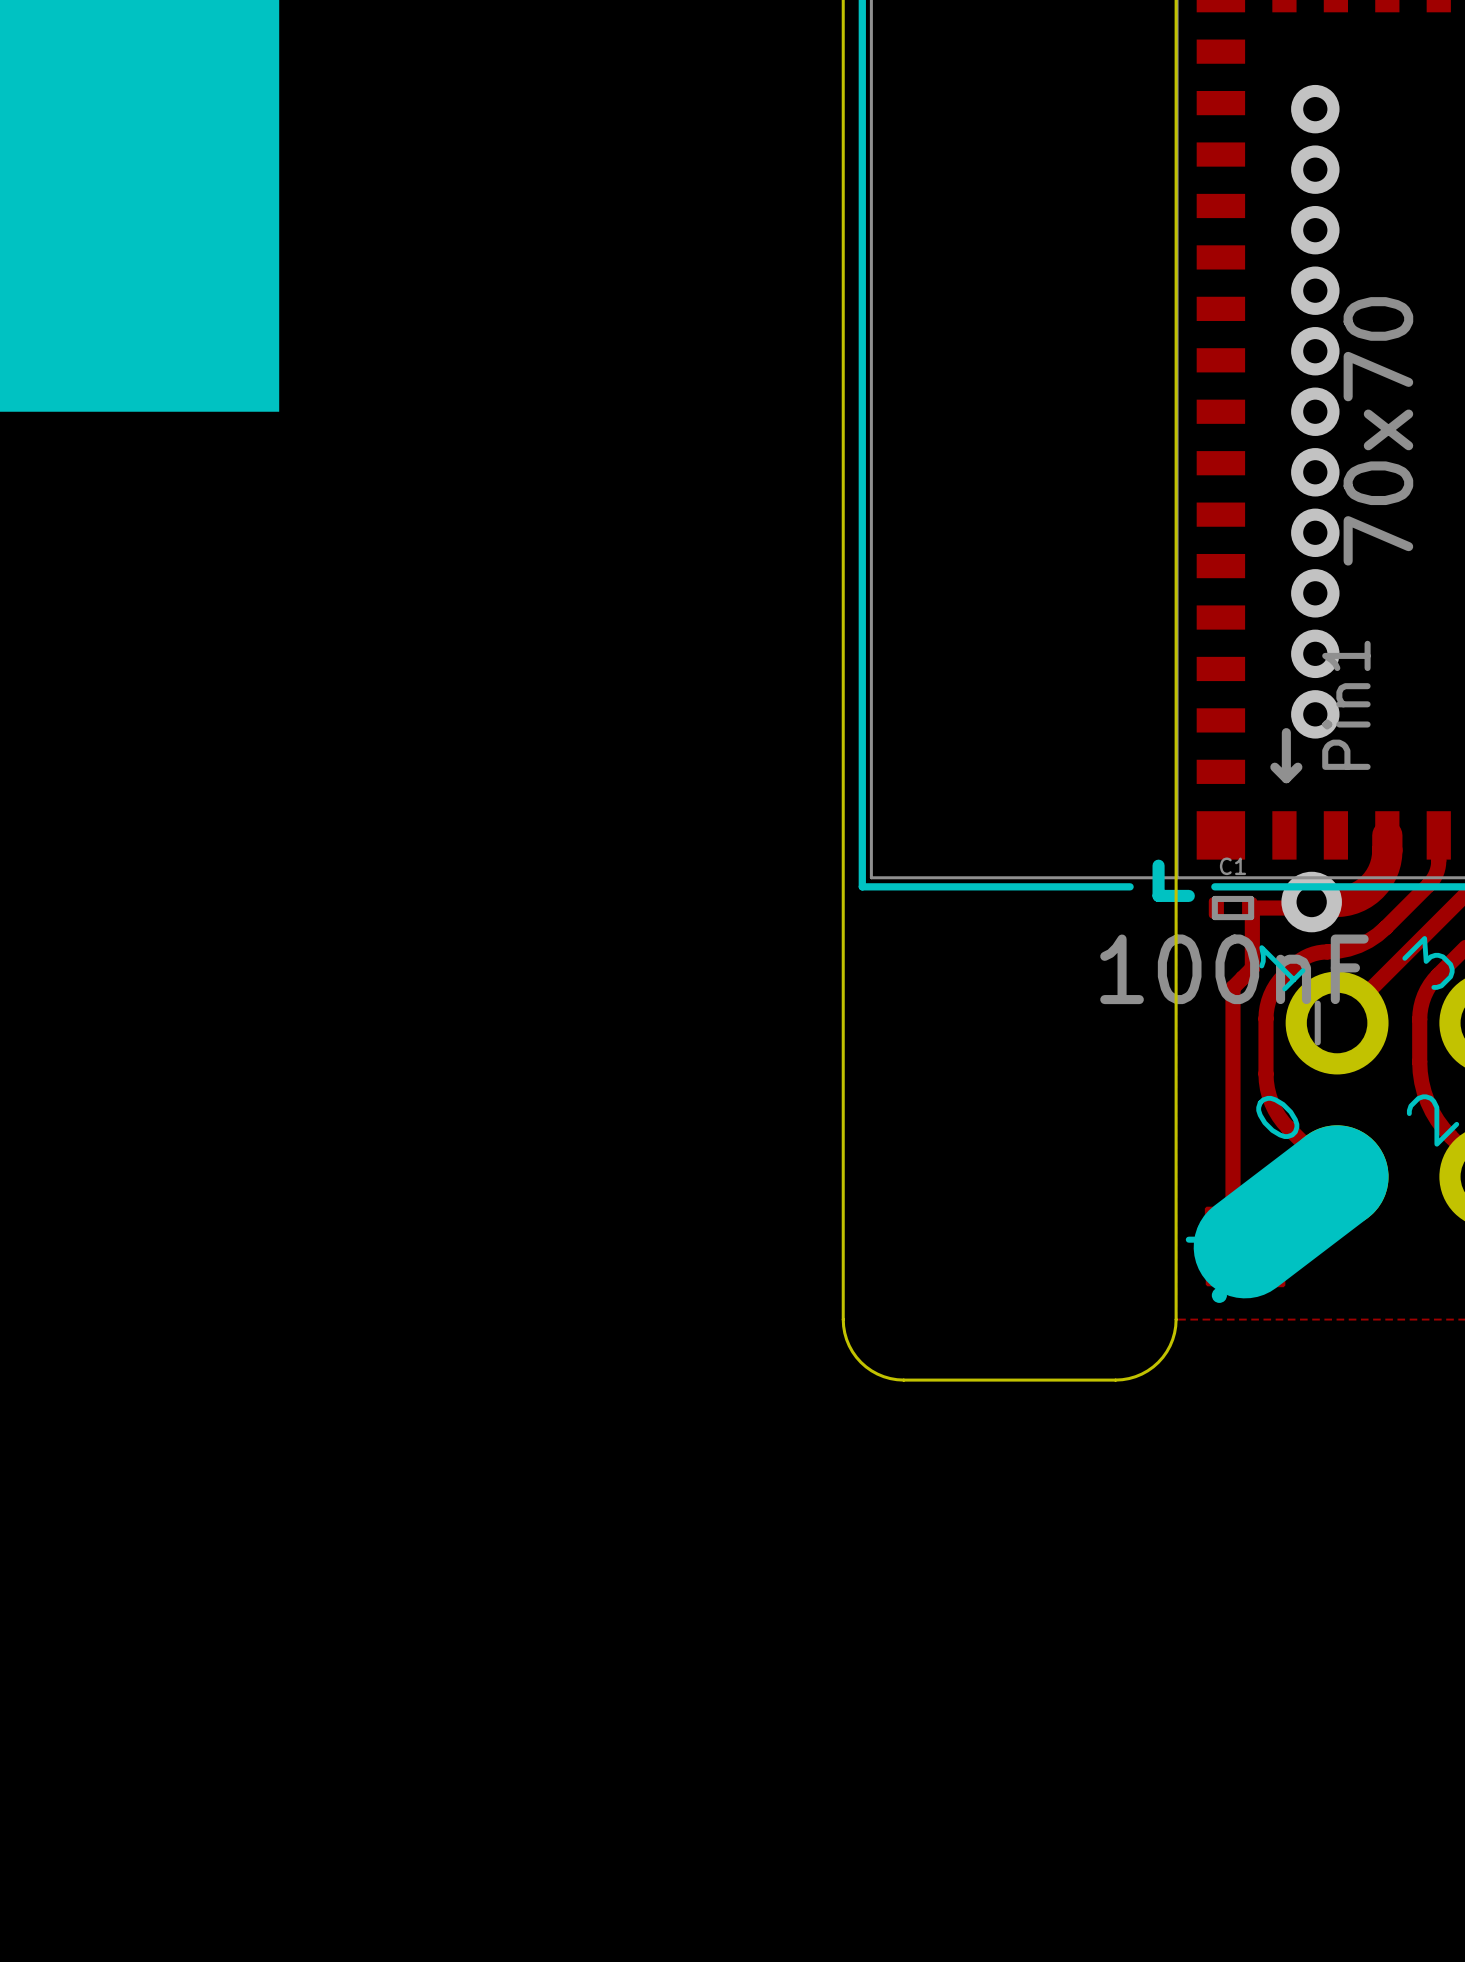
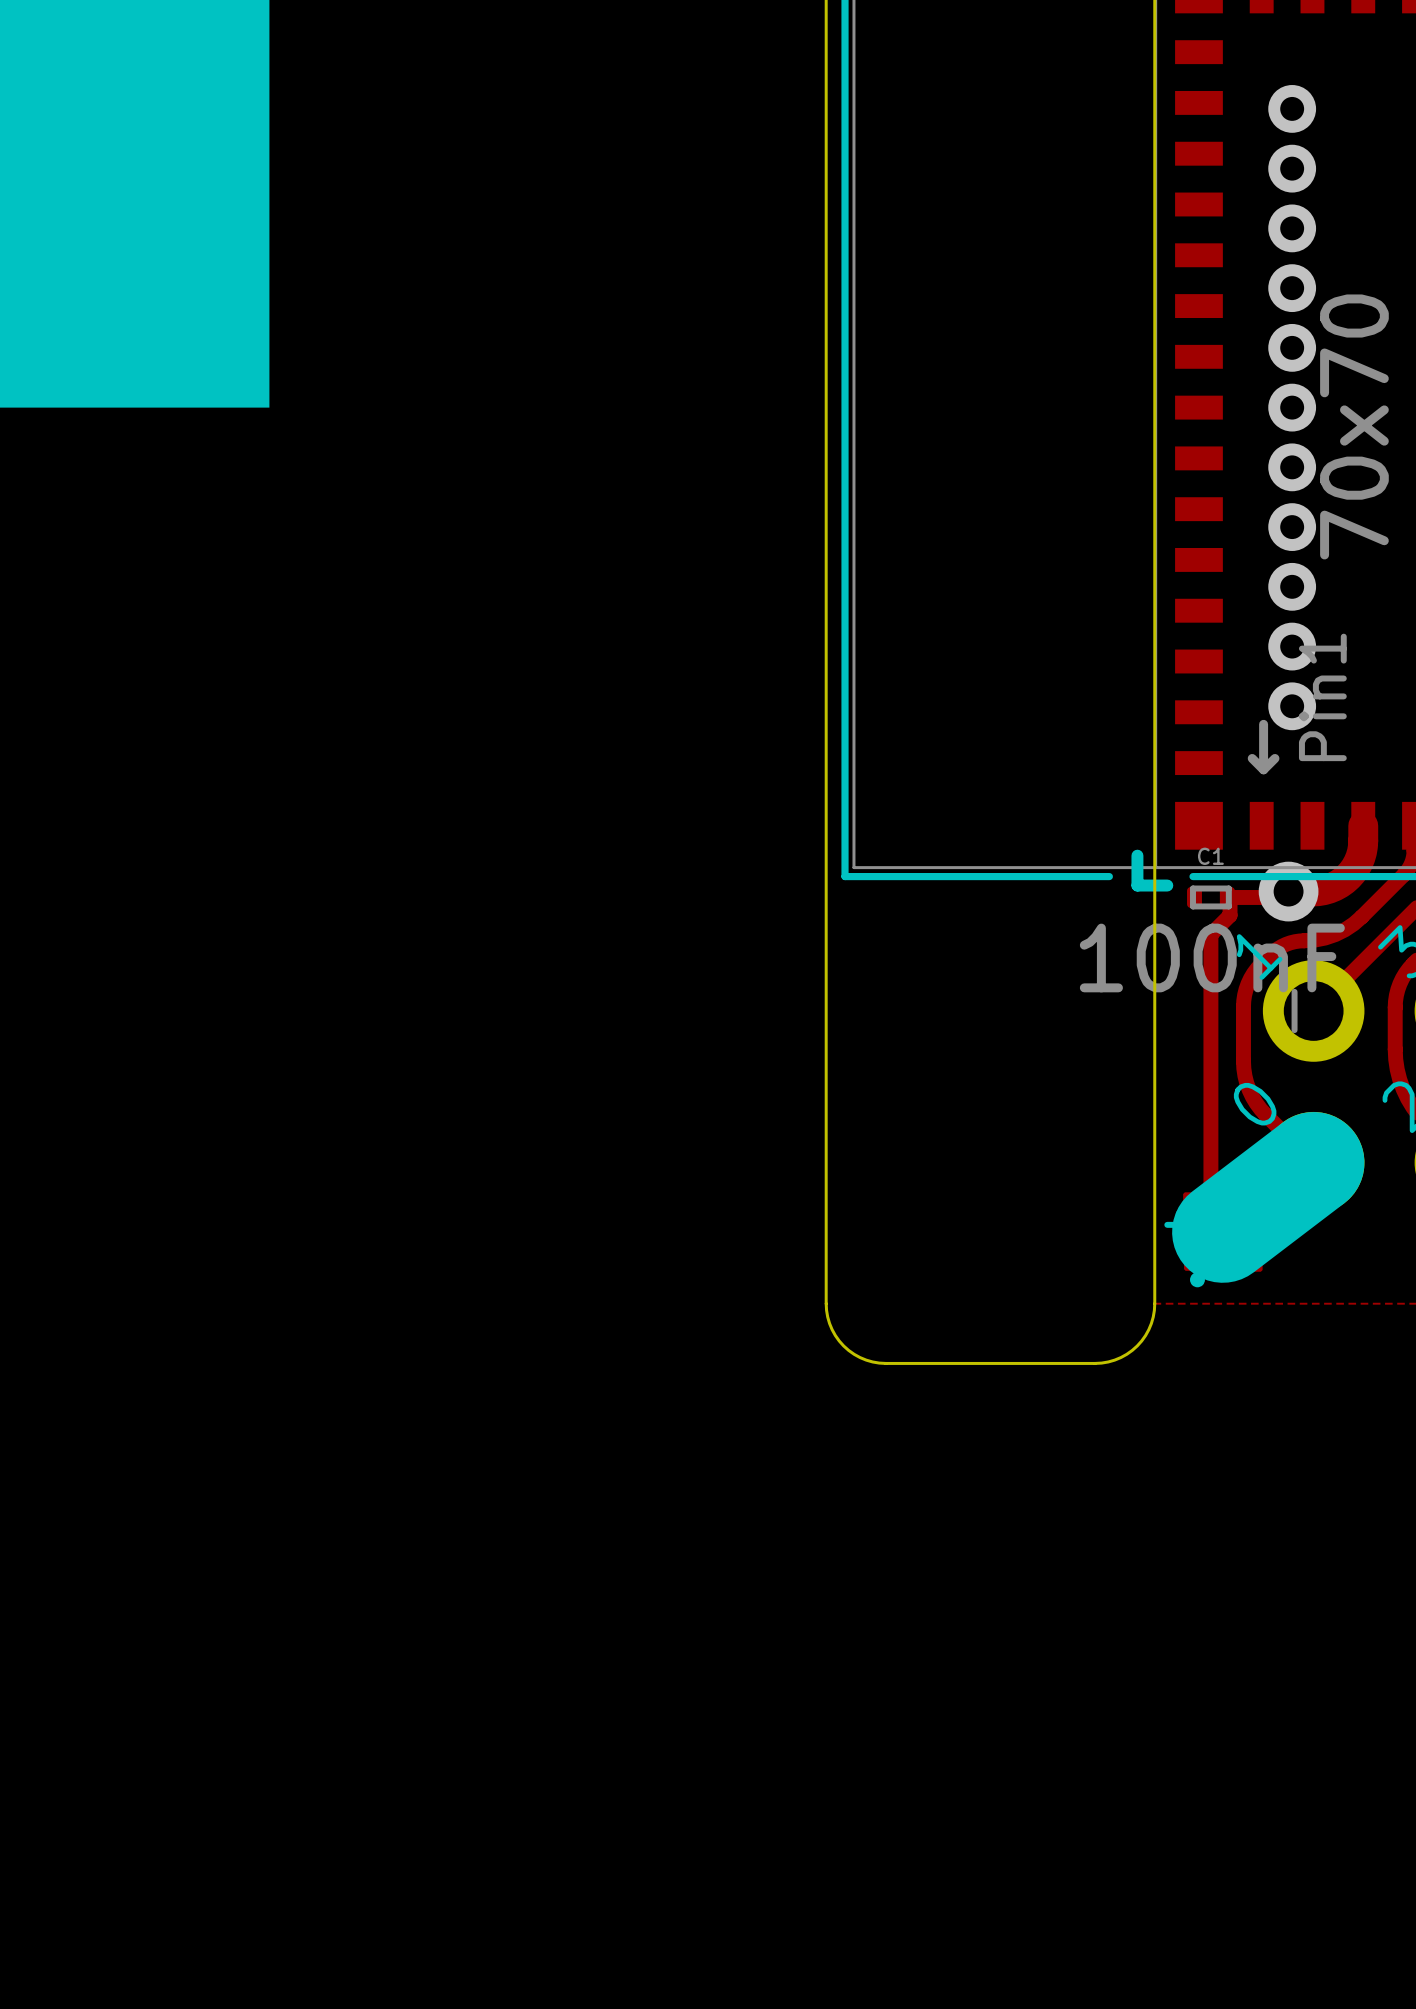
track: (1252, 926) (1252, 968) (1233, 987) -> (1230, 915) (1210, 934) (1210, 976)

